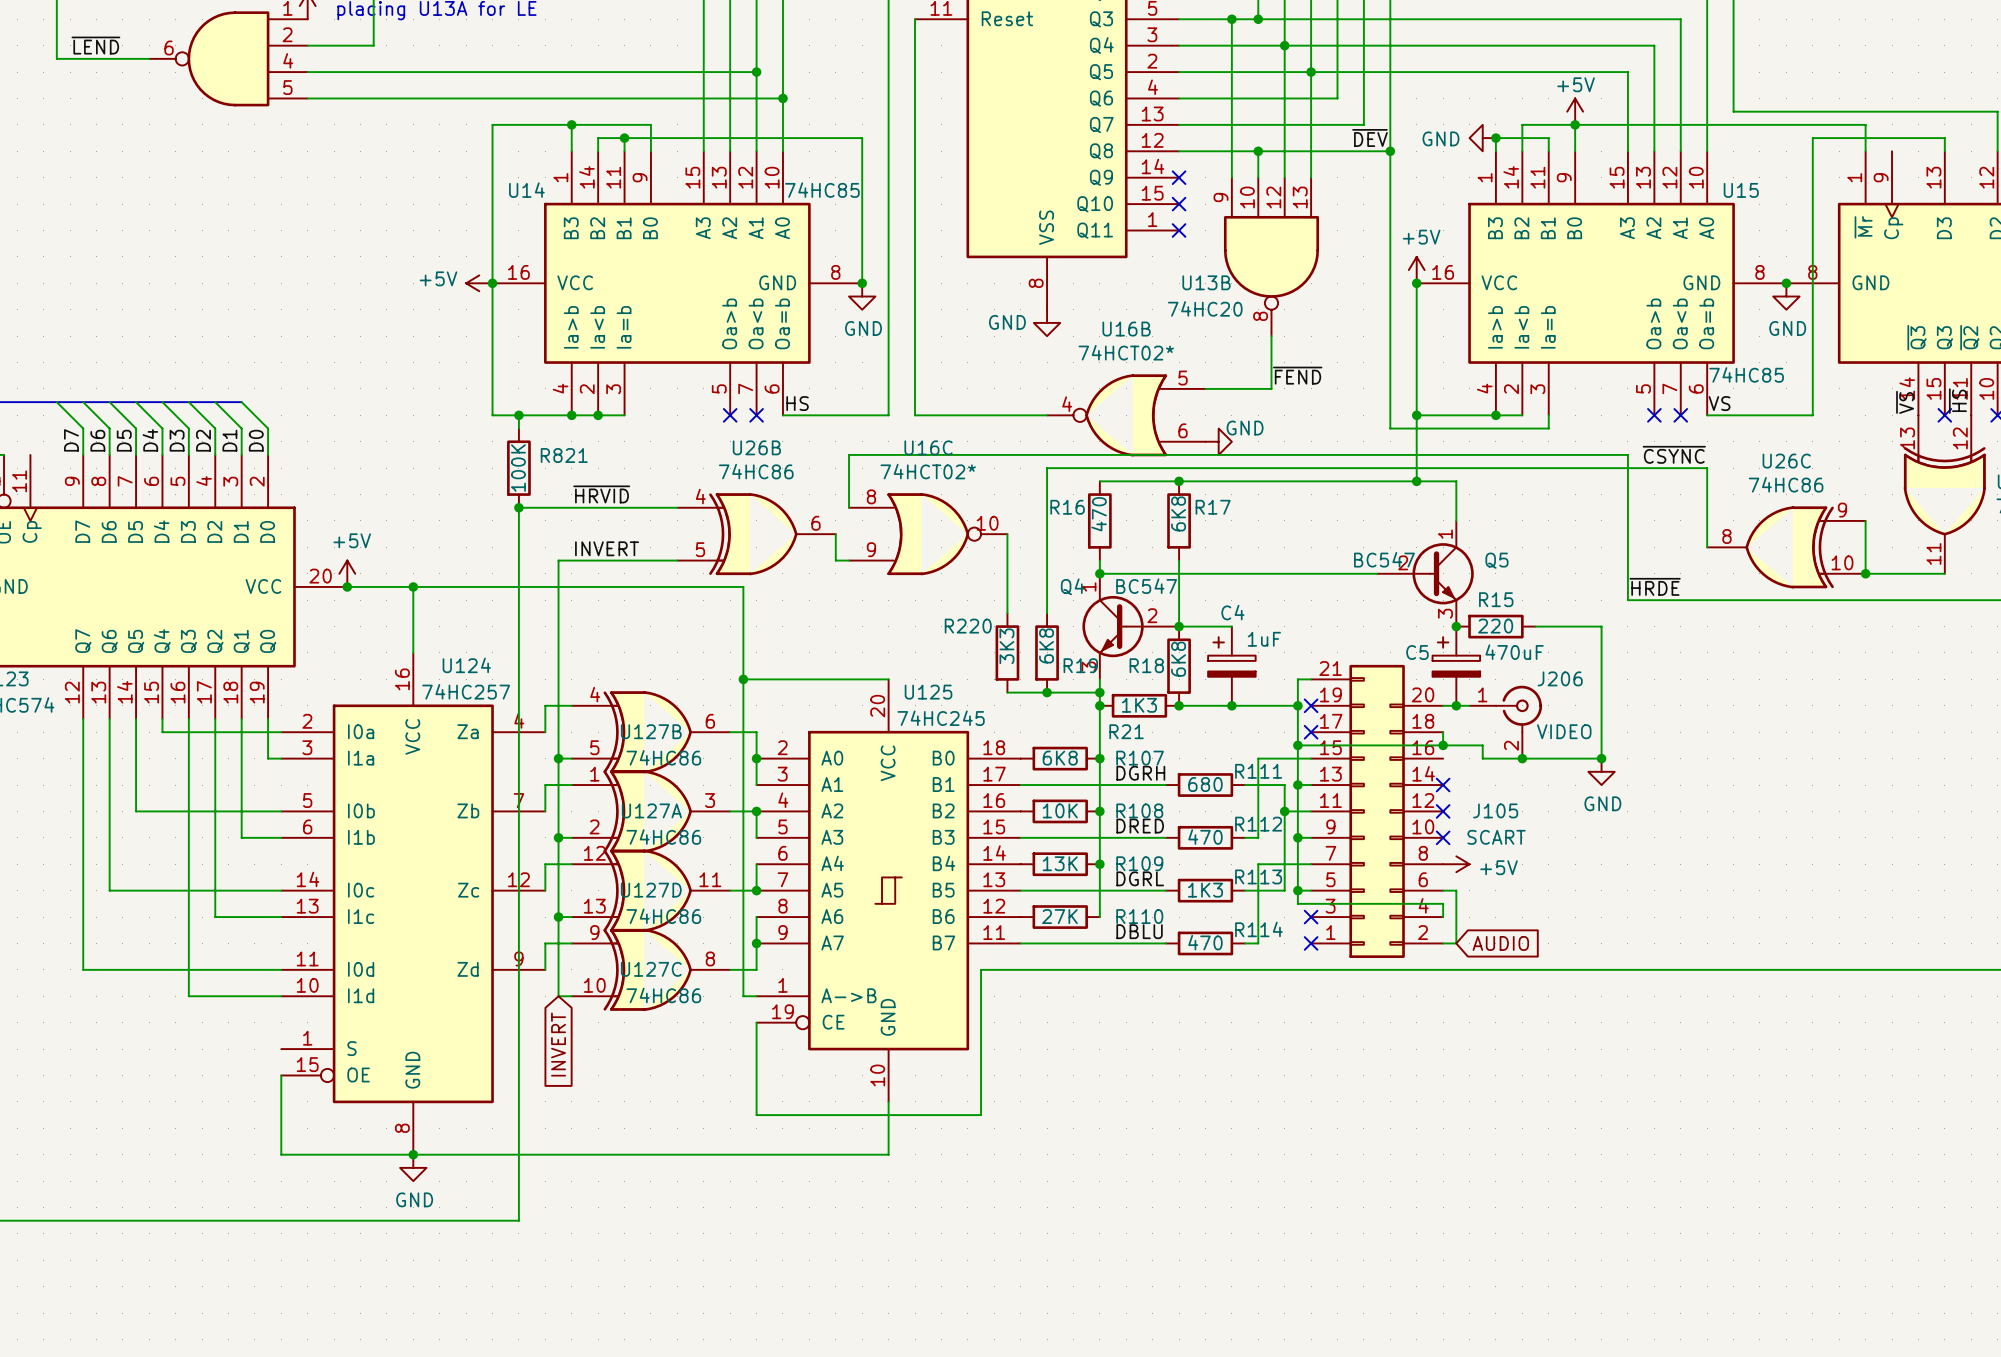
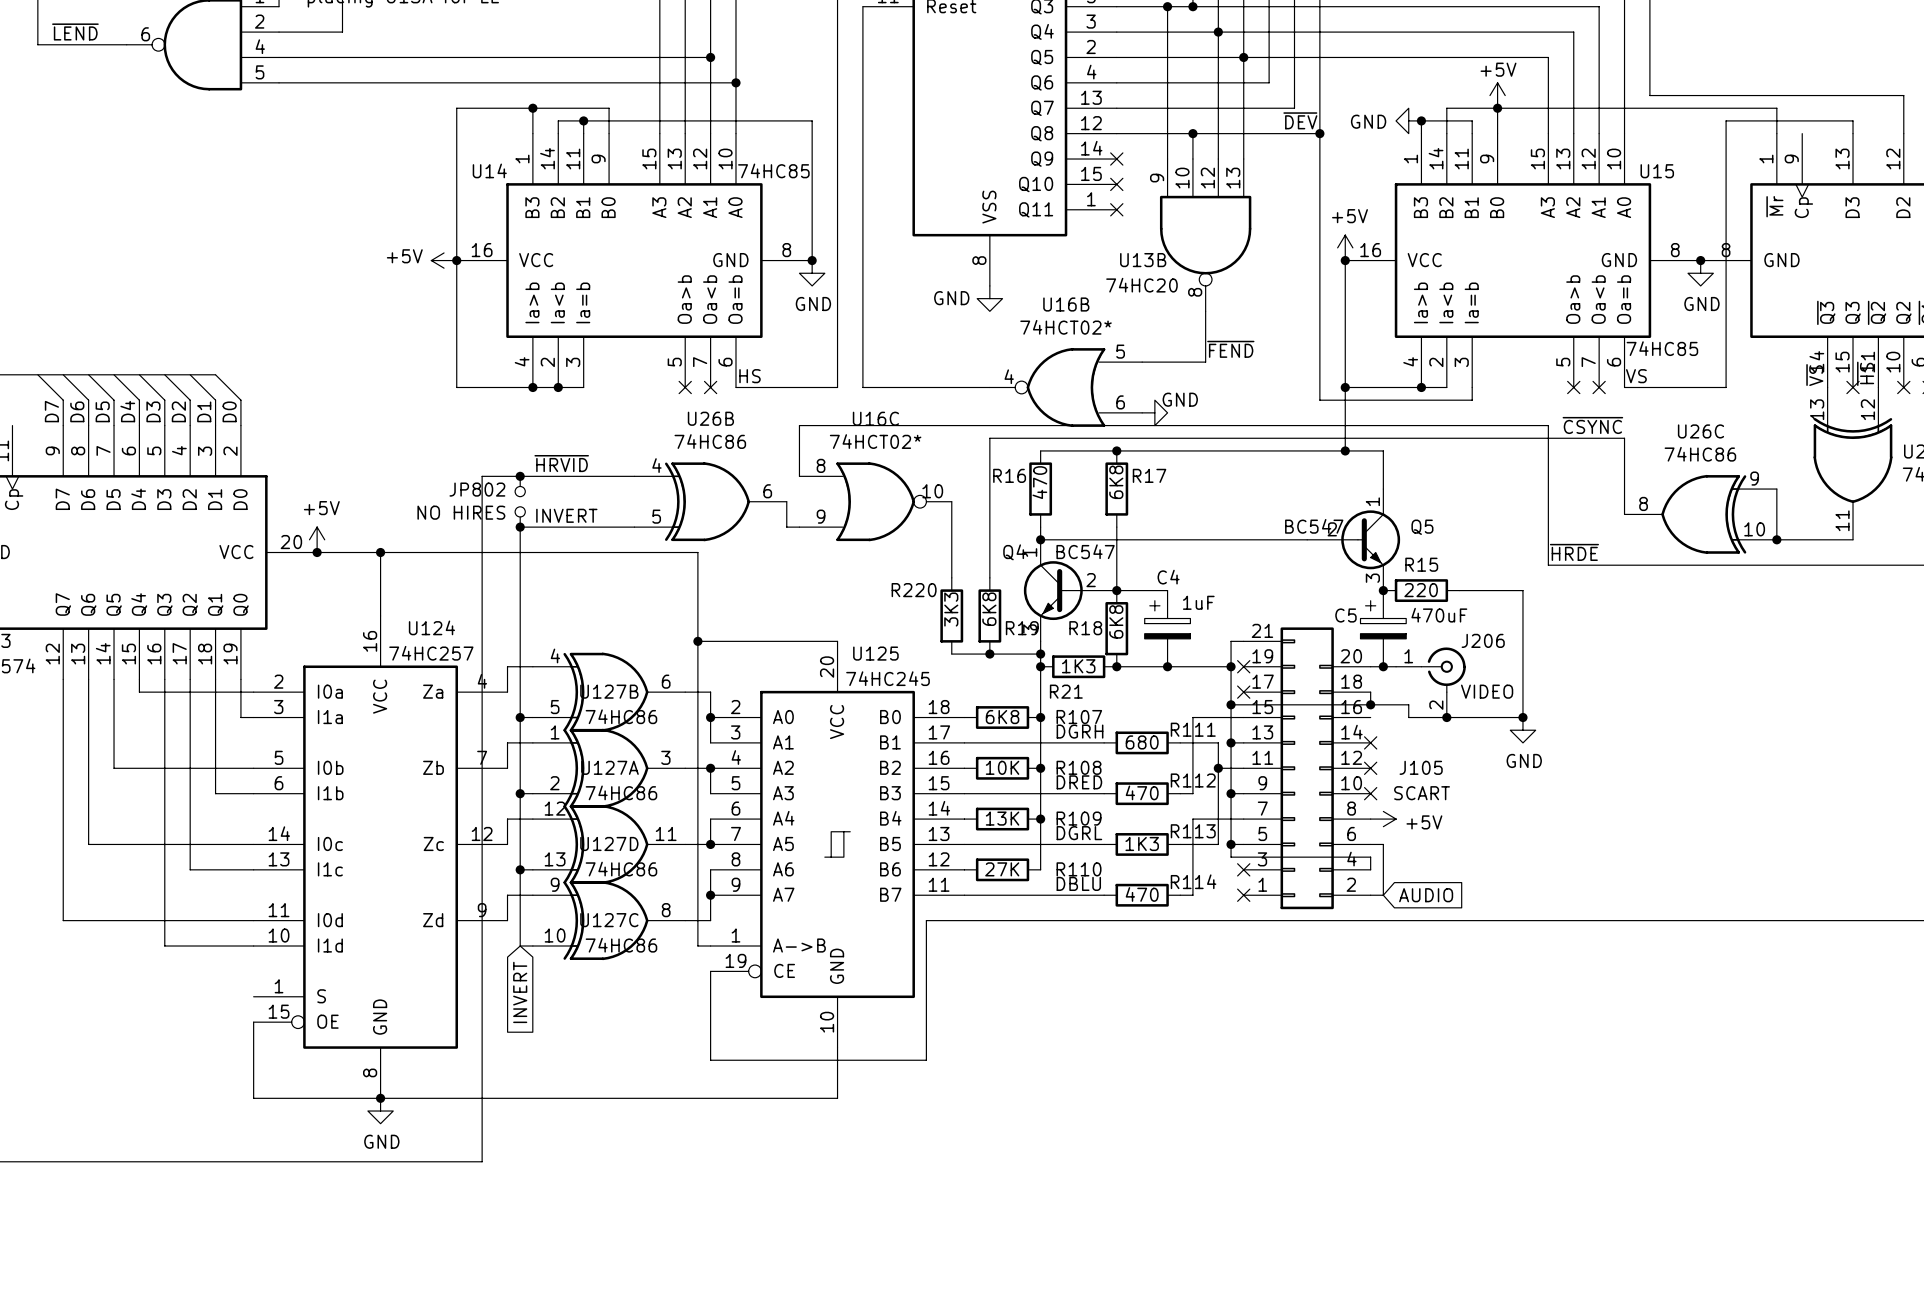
wire: (518, 415) (518, 428) -> none
junction: (518, 415) -> none
R821: 100K (518, 468) -> none
junction: (518, 507) -> none
junction: none -> (520, 476)
JP802: none -> NO HIRES (520, 501)
junction: none -> (520, 527)

